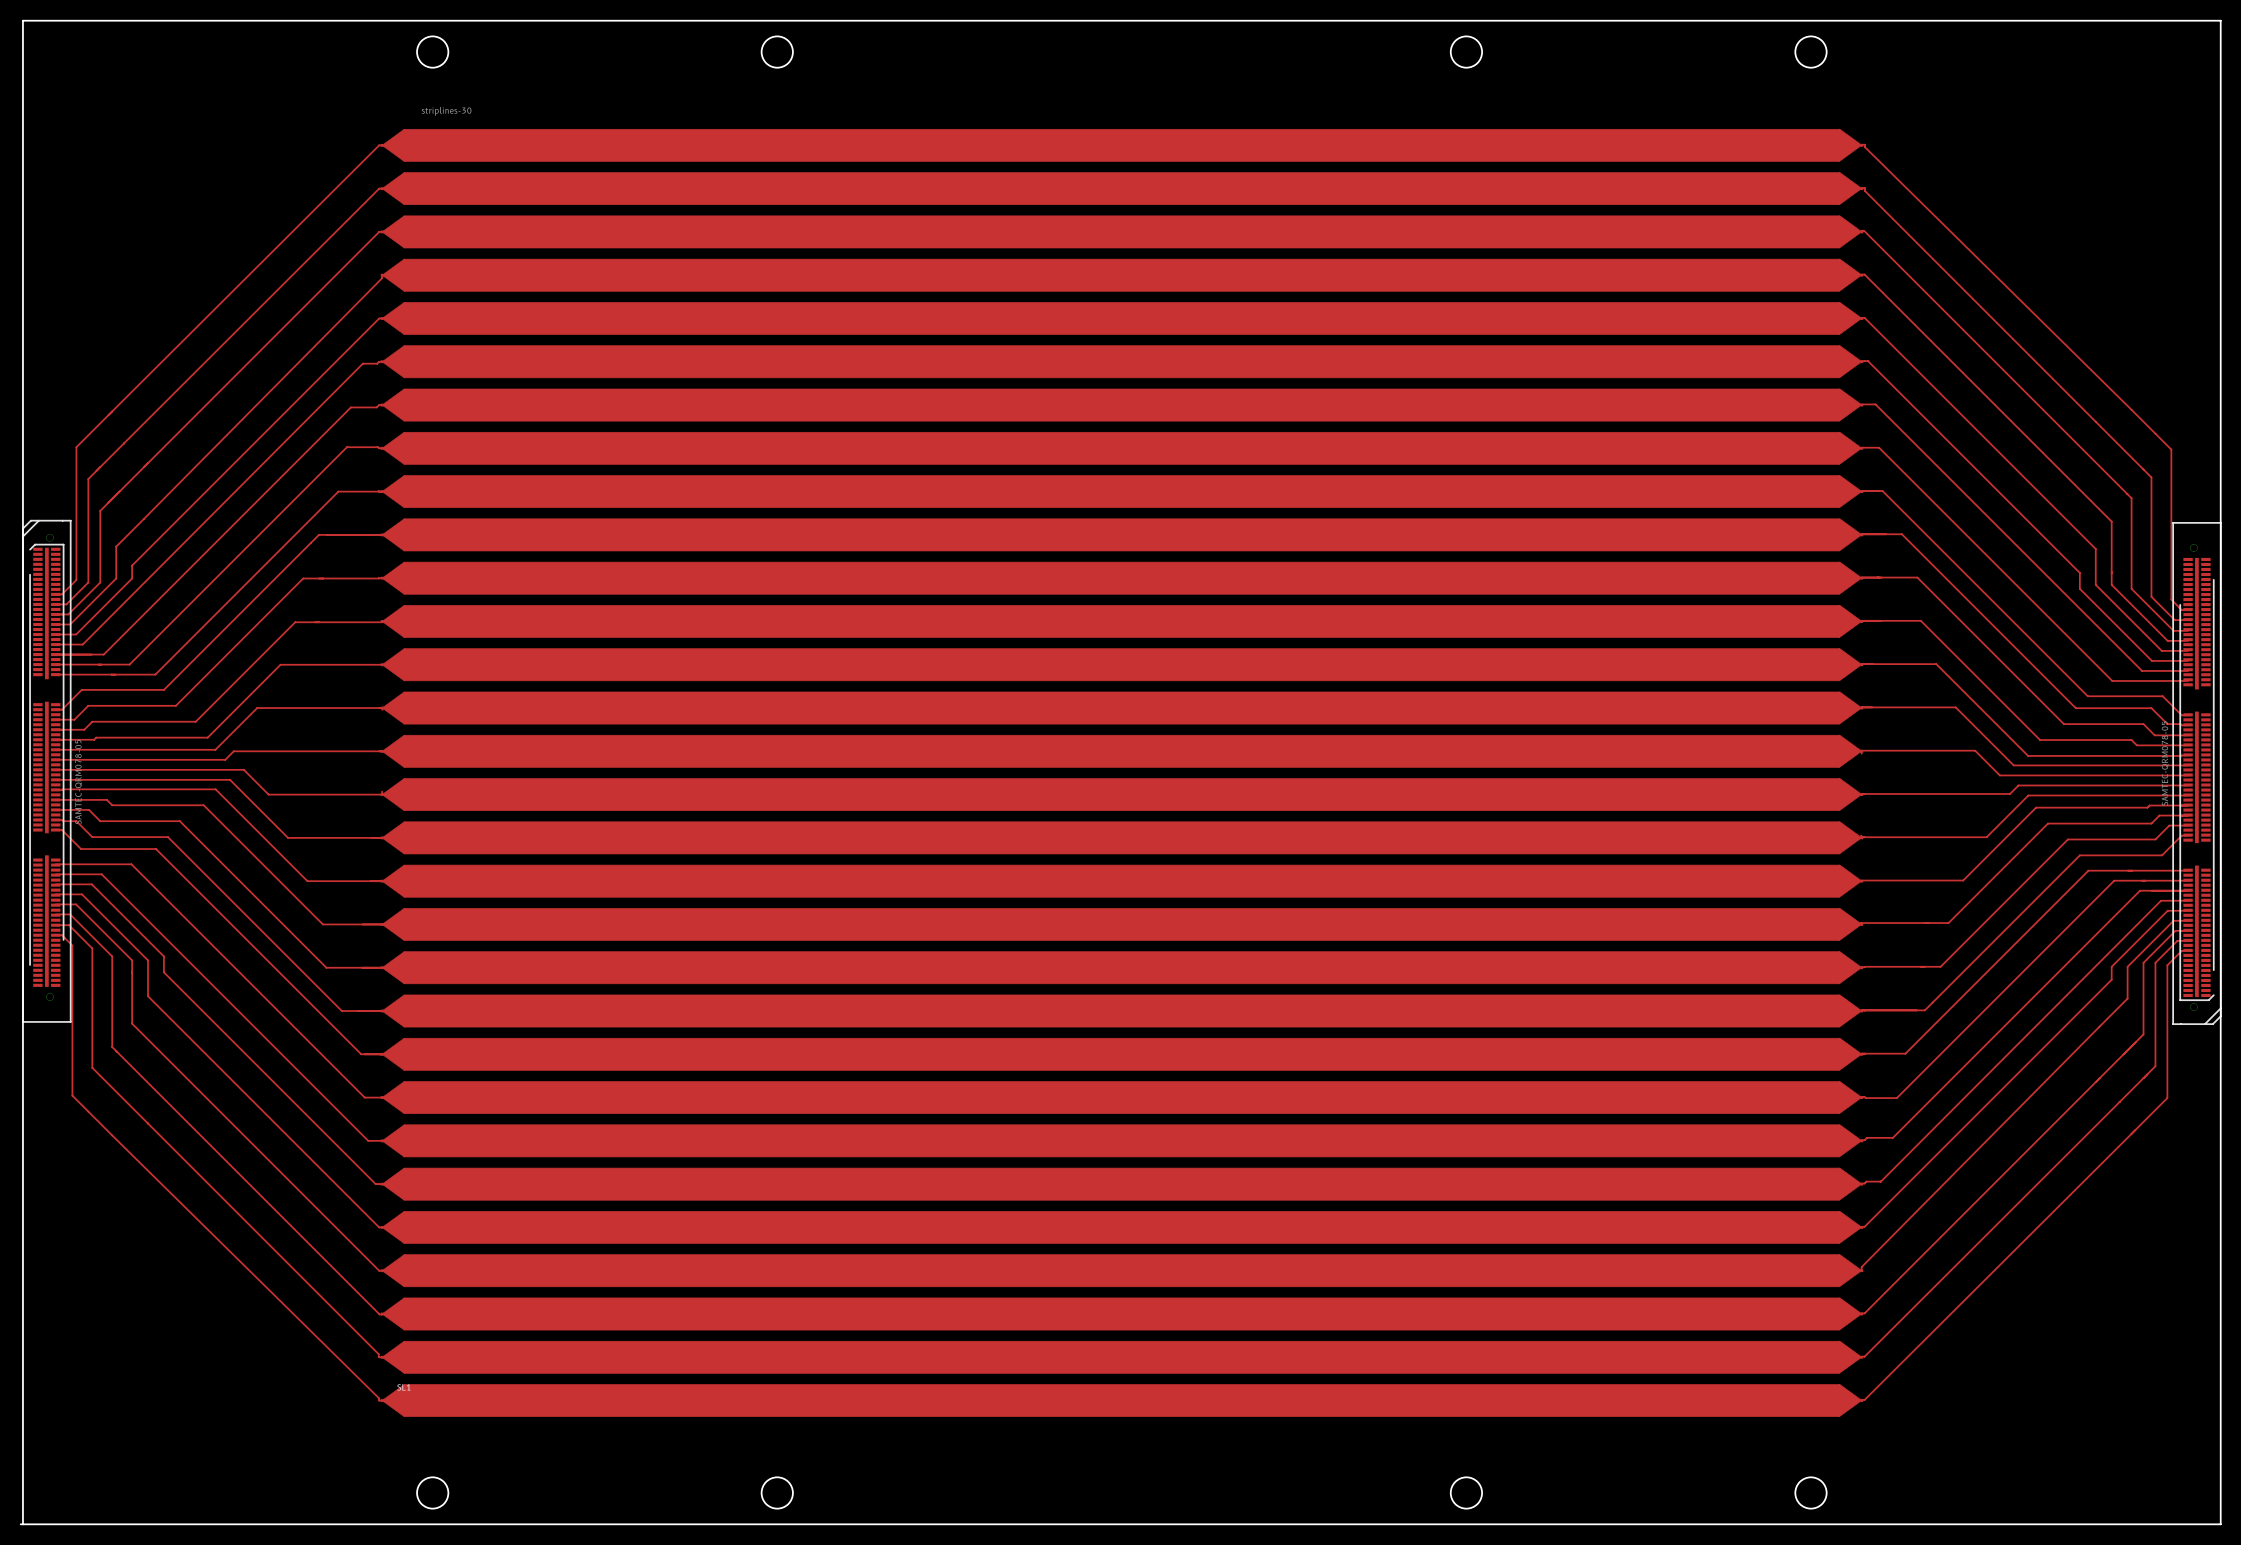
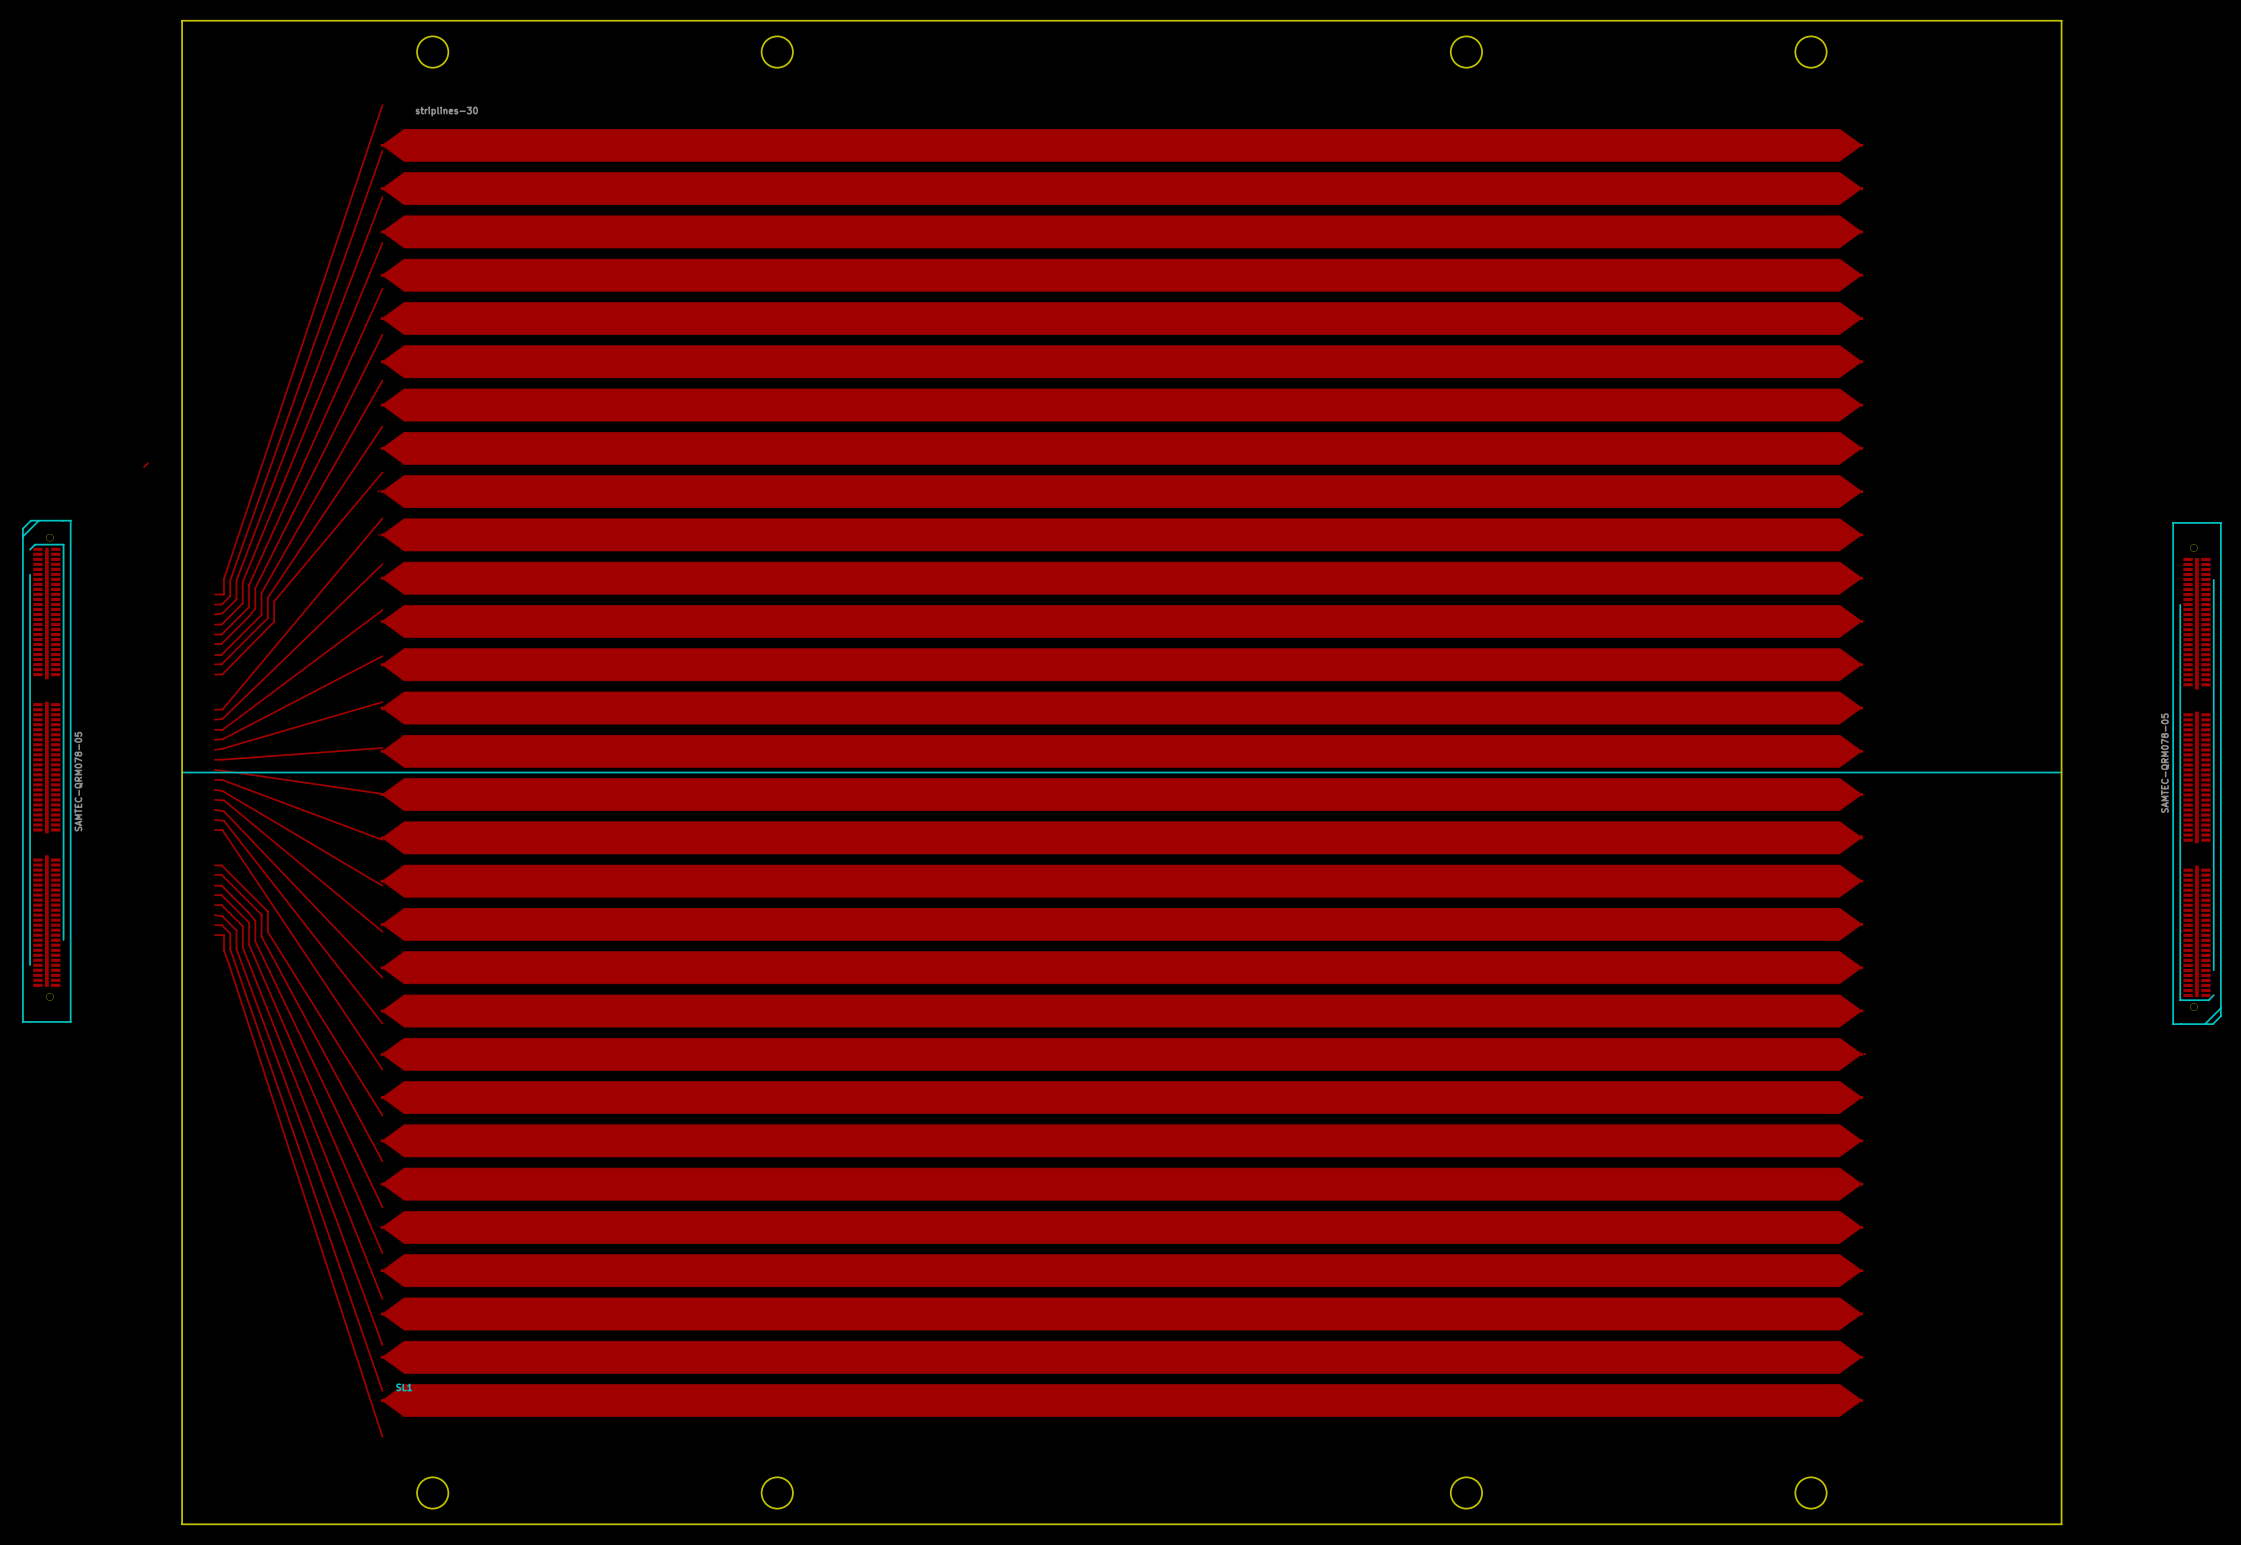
board edge: (182, 20) (22, 20) (22, 1524) -> (182, 20) (182, 1524)
board edge: (2061, 20) (2220, 20) (2220, 1524) (2061, 1524) -> (2061, 20) (2061, 1524)
top track: none -> (382, 105) (223, 578) (223, 594) (214, 594)
top track: (1861, 144) (1864, 144) (1865, 147) (2171, 449) (2171, 599) (2181, 610) (2188, 610) -> none
top track: (382, 145) (379, 145) (76, 447) (76, 580) (62, 594) (55, 594) -> none
top track: none -> (382, 151) (230, 580) (230, 596) (221, 604) (214, 604)
top track: (382, 188) (379, 188) (124, 443) -> none
top track: (1861, 188) (1864, 188) (1865, 191) (2151, 477) (2151, 596) (2174, 620) (2188, 620) -> none
top track: none -> (382, 196) (236, 580) (236, 599) (222, 613) (214, 614)
top track: (382, 231) (379, 231) (100, 510) (100, 582) (68, 614) (55, 614) -> none
top track: (1861, 231) (1864, 230) (2131, 498) (2131, 588) (2173, 630) (2188, 630) -> none
top track: none -> (382, 242) (242, 582) (242, 603) (221, 624) (214, 624)
top track: (1861, 274) (1864, 274) (2111, 521) (2111, 584) (2167, 640) (2188, 640) -> none
top track: (382, 275) (382, 278) (116, 546) (116, 578) (70, 624) (55, 624) -> none
top track: none -> (382, 288) (249, 585) (249, 607) (221, 634) (214, 634)
top track: (1861, 317) (1864, 317) (2095, 549) (2095, 584) (2161, 650) (2188, 650) -> none
top track: (382, 318) (379, 318) (132, 565) (132, 578) (76, 634) (55, 634) -> none
top track: none -> (382, 334) (255, 588) (255, 608) (221, 643) (214, 643)
top track: (382, 361) (362, 363) (82, 644) (55, 644) -> none
top track: (1861, 361) (1868, 361) (2079, 572) (2079, 588) (2151, 660) (2188, 660) -> none
top track: none -> (382, 380) (261, 593) (261, 614) (221, 654) (214, 654)
top track: (1861, 404) (1875, 404) (2142, 670) (2188, 670) -> none
top track: (382, 405) (376, 407) (350, 407) (103, 654) (55, 654) -> none
top track: (2095, 421) (2096, 422) -> none
top track: none -> (382, 426) (267, 597) (267, 618) (221, 664) (214, 664)
top track: (124, 443) (88, 479) (88, 582) (66, 604) (55, 604) -> none
top track: (1861, 447) (1879, 447) (2112, 680) (2188, 680) -> none
top track: (382, 448) (346, 447) (129, 664) (55, 664) -> none
top track: none -> (382, 472) (274, 601) (274, 621) (222, 674) (214, 674)
top track: (1861, 490) (1882, 490) (2087, 696) (2162, 696) (2181, 715) (2188, 715) -> none
top track: (382, 491) (338, 491) (155, 674) (55, 674) -> none
top track: none -> (382, 518) (222, 709) (214, 709)
top track: (382, 534) (318, 534) (163, 689) (81, 689) (62, 709) (55, 709) -> none
top track: (1861, 534) (1901, 534) (2075, 708) (2151, 708) (2167, 724) (2188, 725) -> none
top track: none -> (382, 564) (222, 718) (214, 719)
top track: (1861, 577) (1917, 577) (2063, 724) (2143, 724) (2154, 735) (2188, 735) -> none
top track: (382, 578) (303, 578) (175, 705) (88, 705) (74, 719) (55, 719) -> none
top track: none -> (382, 610) (222, 729) (214, 729)
top track: (1861, 620) (1920, 620) (2040, 740) (2131, 740) (2136, 745) (2188, 745) -> none
top track: (382, 621) (295, 622) (195, 721) (92, 721) (84, 729) (55, 729) -> none
top track: none -> (382, 656) (222, 739) (214, 739)
top track: (382, 664) (280, 664) (207, 737) (96, 737) (94, 739) (55, 739) -> none
top track: (1861, 664) (1936, 664) (2028, 755) (2188, 755) -> none
top track: none -> (382, 702) (214, 749)
top track: (1861, 707) (1955, 707) (2013, 765) (2188, 765) -> none
top track: (382, 708) (257, 708) (215, 749) (55, 749) -> none
top track: none -> (382, 748) (214, 759)
top track: (382, 751) (233, 751) (225, 759) (55, 759) -> none
top track: (1861, 753) (1861, 750) (1975, 750) (1999, 775) (2188, 775) -> none
top track: (55, 769) (243, 769) (268, 794) (382, 794) (382, 791) -> none
top track: none -> (214, 769) (382, 793)
line: none -> (182, 772) (2061, 772)
top track: (55, 779) (230, 779) (288, 837) (382, 837) -> none
top track: none -> (214, 779) (222, 780) (382, 839)
top track: (2188, 785) (2018, 785) (2010, 793) (1861, 793) -> none
top track: (55, 789) (215, 789) (307, 881) (382, 881) -> none
top track: none -> (214, 789) (222, 791) (382, 885)
top track: (2188, 795) (2028, 795) (1986, 837) (1861, 837) -> none
top track: (55, 799) (106, 799) (112, 805) (203, 805) (322, 924) (382, 924) -> none
top track: none -> (214, 799) (224, 800) (382, 931)
top track: (2188, 805) (2149, 805) (2147, 807) (2036, 807) (1963, 880) (1861, 880) -> none
top track: (55, 809) (89, 809) (100, 821) (179, 821) (326, 967) (382, 967) -> none
top track: none -> (214, 809) (224, 811) (382, 977)
top track: (2188, 815) (2159, 815) (2151, 823) (2048, 823) (1948, 923) (1861, 923) -> none
top track: (55, 819) (76, 821) (92, 837) (167, 837) (341, 1011) (382, 1011) -> none
top track: none -> (214, 819) (224, 820) (382, 1023)
top track: (2188, 825) (2169, 825) (2155, 839) (2067, 839) (1940, 966) (1861, 967) -> none
top track: (55, 829) (62, 829) (81, 849) (155, 849) (361, 1054) (382, 1054) -> none
top track: none -> (214, 829) (222, 830) (382, 1069)
top track: (2188, 835) (2181, 835) (2161, 855) (2079, 855) (1924, 1010) (1861, 1010) -> none
top track: (55, 864) (131, 864) (364, 1097) (382, 1097) -> none
top track: none -> (214, 865) (221, 865) (267, 911) (267, 931) (382, 1115)
top track: (2188, 870) (2088, 870) (1905, 1053) (1861, 1053) -> none
top track: (55, 874) (101, 874) (368, 1140) (382, 1140) -> none
top track: none -> (214, 874) (221, 874) (261, 914) (261, 936) (382, 1161)
top track: (2188, 880) (2114, 880) (1896, 1098) (1861, 1096) -> none
top track: (55, 884) (91, 884) (163, 956) (163, 972) (375, 1184) (382, 1184) -> none
top track: none -> (214, 885) (221, 885) (255, 921) (255, 941) (382, 1207)
top track: (2188, 890) (2140, 890) (1892, 1137) (1866, 1137) (1861, 1140) -> none
top track: (55, 894) (81, 894) (148, 960) (148, 996) (379, 1227) (382, 1227) -> none
top track: none -> (214, 895) (221, 895) (249, 922) (249, 944) (382, 1253)
top track: (2188, 900) (2161, 900) (1880, 1181) (1861, 1183) -> none
top track: (55, 904) (76, 904) (132, 960) (132, 1023) (379, 1270) (382, 1270) -> none
top track: none -> (214, 905) (221, 905) (242, 926) (242, 947) (382, 1299)
top track: (2188, 910) (2167, 910) (2111, 966) (2111, 979) (1864, 1226) (1861, 1226) -> none
top track: (55, 914) (70, 914) (112, 956) (112, 1047) (379, 1314) (382, 1314) -> none
top track: none -> (214, 915) (222, 916) (236, 930) (236, 949) (382, 1344)
top track: (2188, 920) (2173, 920) (2127, 966) (2127, 998) (1861, 1267) (1861, 1270) -> none
top track: (55, 925) (69, 925) (92, 948) (92, 1067) (378, 1354) (379, 1357) (382, 1357) -> none
top track: none -> (214, 925) (221, 925) (230, 933) (230, 949) (382, 1390)
top track: (2188, 930) (2175, 930) (2143, 962) (2143, 1034) (2095, 1082) -> none
top track: (55, 935) (62, 935) (72, 945) (72, 1095) (378, 1398) (379, 1400) (382, 1400) -> none
top track: none -> (214, 935) (224, 935) (224, 950) (382, 1436)
top track: (2188, 940) (2177, 940) (2155, 962) (2155, 1066) (2119, 1102) -> none
top track: (2188, 950) (2181, 950) (2167, 965) (2167, 1098) (1864, 1399) (1861, 1399) -> none
top track: (2099, 1078) (2095, 1082) -> none
top track: (2095, 1082) (1864, 1313) (1861, 1313) -> none
top track: (2119, 1102) (1864, 1356) (1861, 1356) -> none
board edge: (20, 1524) (182, 1524) -> none

